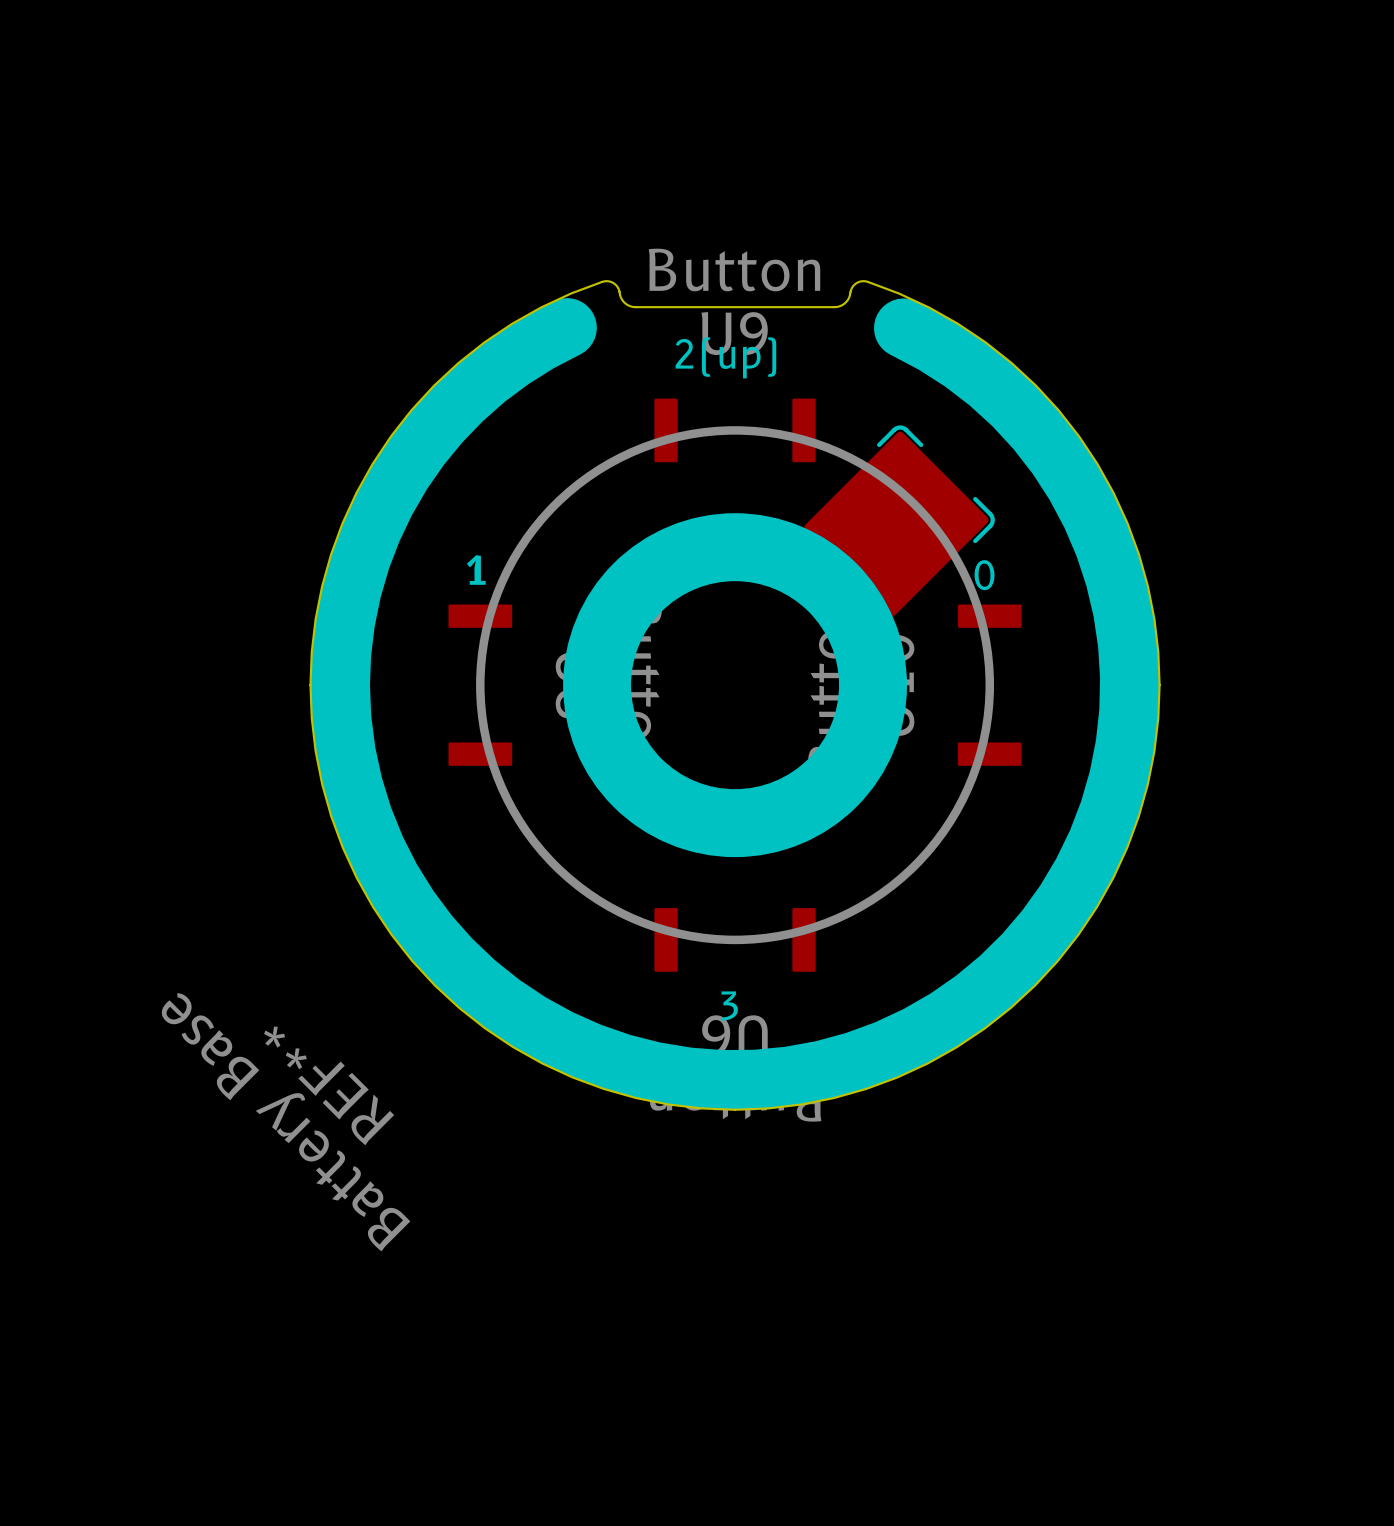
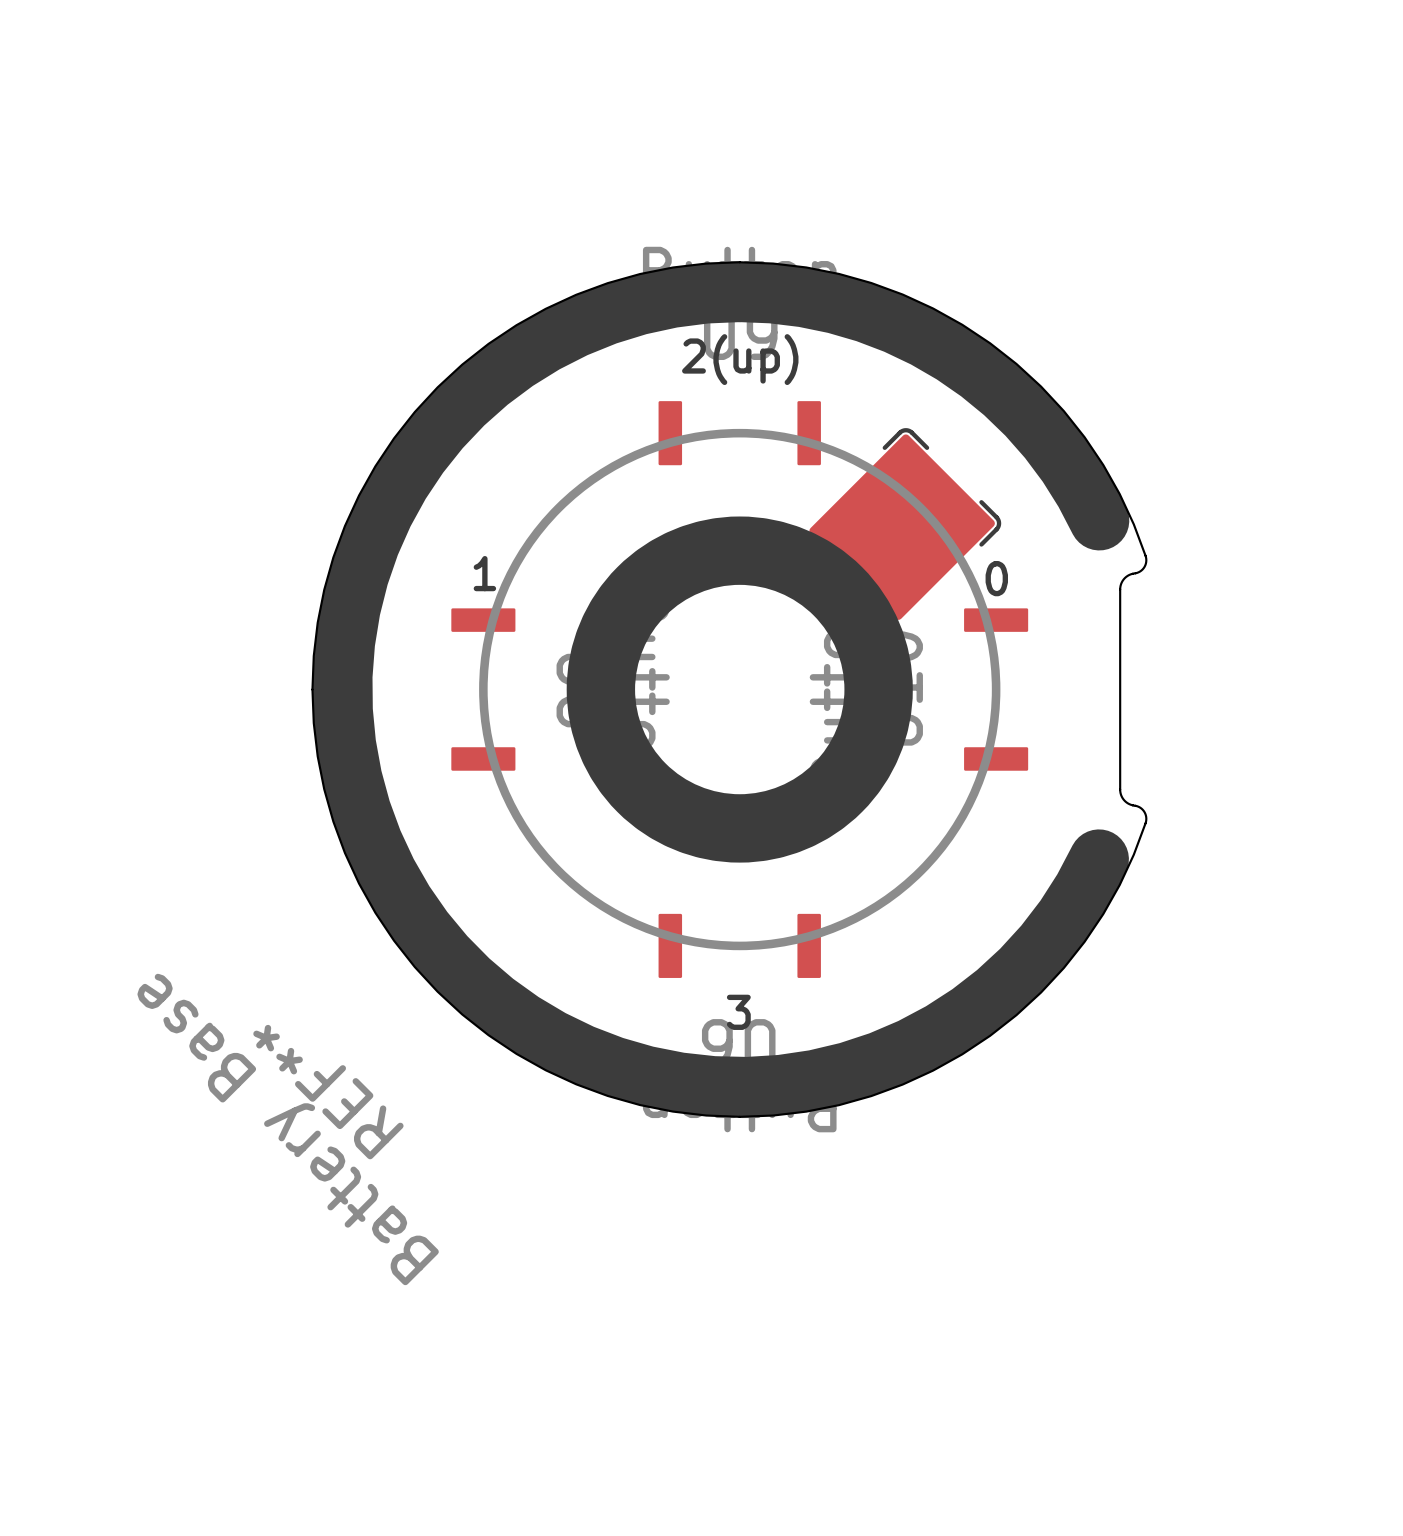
line: (567, 327) (511, 359) (462, 399) (419, 447) (385, 501) (360, 559) (345, 621) (340, 685) (345, 752) (363, 817) (390, 878) (428, 934) (475, 982) (530, 1022) (590, 1052) (655, 1071) (721, 1079) (789, 1076) (854, 1061) (917, 1035) (974, 999) (1023, 954) (1065, 901) (1097, 841) (1118, 777) (1129, 711) (1127, 644) (1115, 577) (1091, 514) (1057, 456) (1013, 405) (961, 362) (903, 328) -> none
line: none -> (1099, 520) (1067, 464) (1027, 415) (979, 372) (924, 337) (865, 312) (803, 297) (739, 292) (672, 297) (606, 315) (544, 343) (488, 381) (440, 428) (400, 483) (369, 544) (350, 609) (342, 676) (346, 744) (361, 810) (387, 872) (423, 930) (468, 980) (522, 1022) (582, 1054) (646, 1075) (713, 1086) (781, 1084) (847, 1071) (911, 1048) (969, 1013) (1021, 969) (1064, 917) (1099, 859)
board edge: (310, 685) (315, 618) (331, 554) (356, 493) (372, 464) (411, 410) (458, 363) (511, 323) (570, 293) (606, 281) (615, 284) (623, 301) (633, 307) (834, 307) (845, 302) (855, 283) (866, 281) (899, 293) (958, 323) (985, 342) (1036, 385) (1079, 436) (1113, 493) (1138, 554) (1154, 618) (1159, 685) (1154, 751) (1138, 816) (1127, 847) (1097, 906) (1057, 960) (1010, 1008) (956, 1047) (897, 1077) (866, 1088) (801, 1104) (735, 1109) -> (312, 689) (313, 656) (324, 589) (344, 526) (375, 466) (414, 412) (462, 364) (516, 325) (576, 294) (607, 283) (672, 267) (739, 262) (806, 267) (871, 283) (933, 308) (990, 343) (1041, 386) (1084, 437) (1103, 464) (1133, 524) (1145, 557) (1143, 568) (1124, 578) (1120, 589) (1120, 791) (1126, 802) (1142, 809) (1146, 818) (1133, 854) (1103, 914) (1063, 968) (1041, 992) (990, 1035) (933, 1070) (871, 1096) (806, 1111) (739, 1116)

